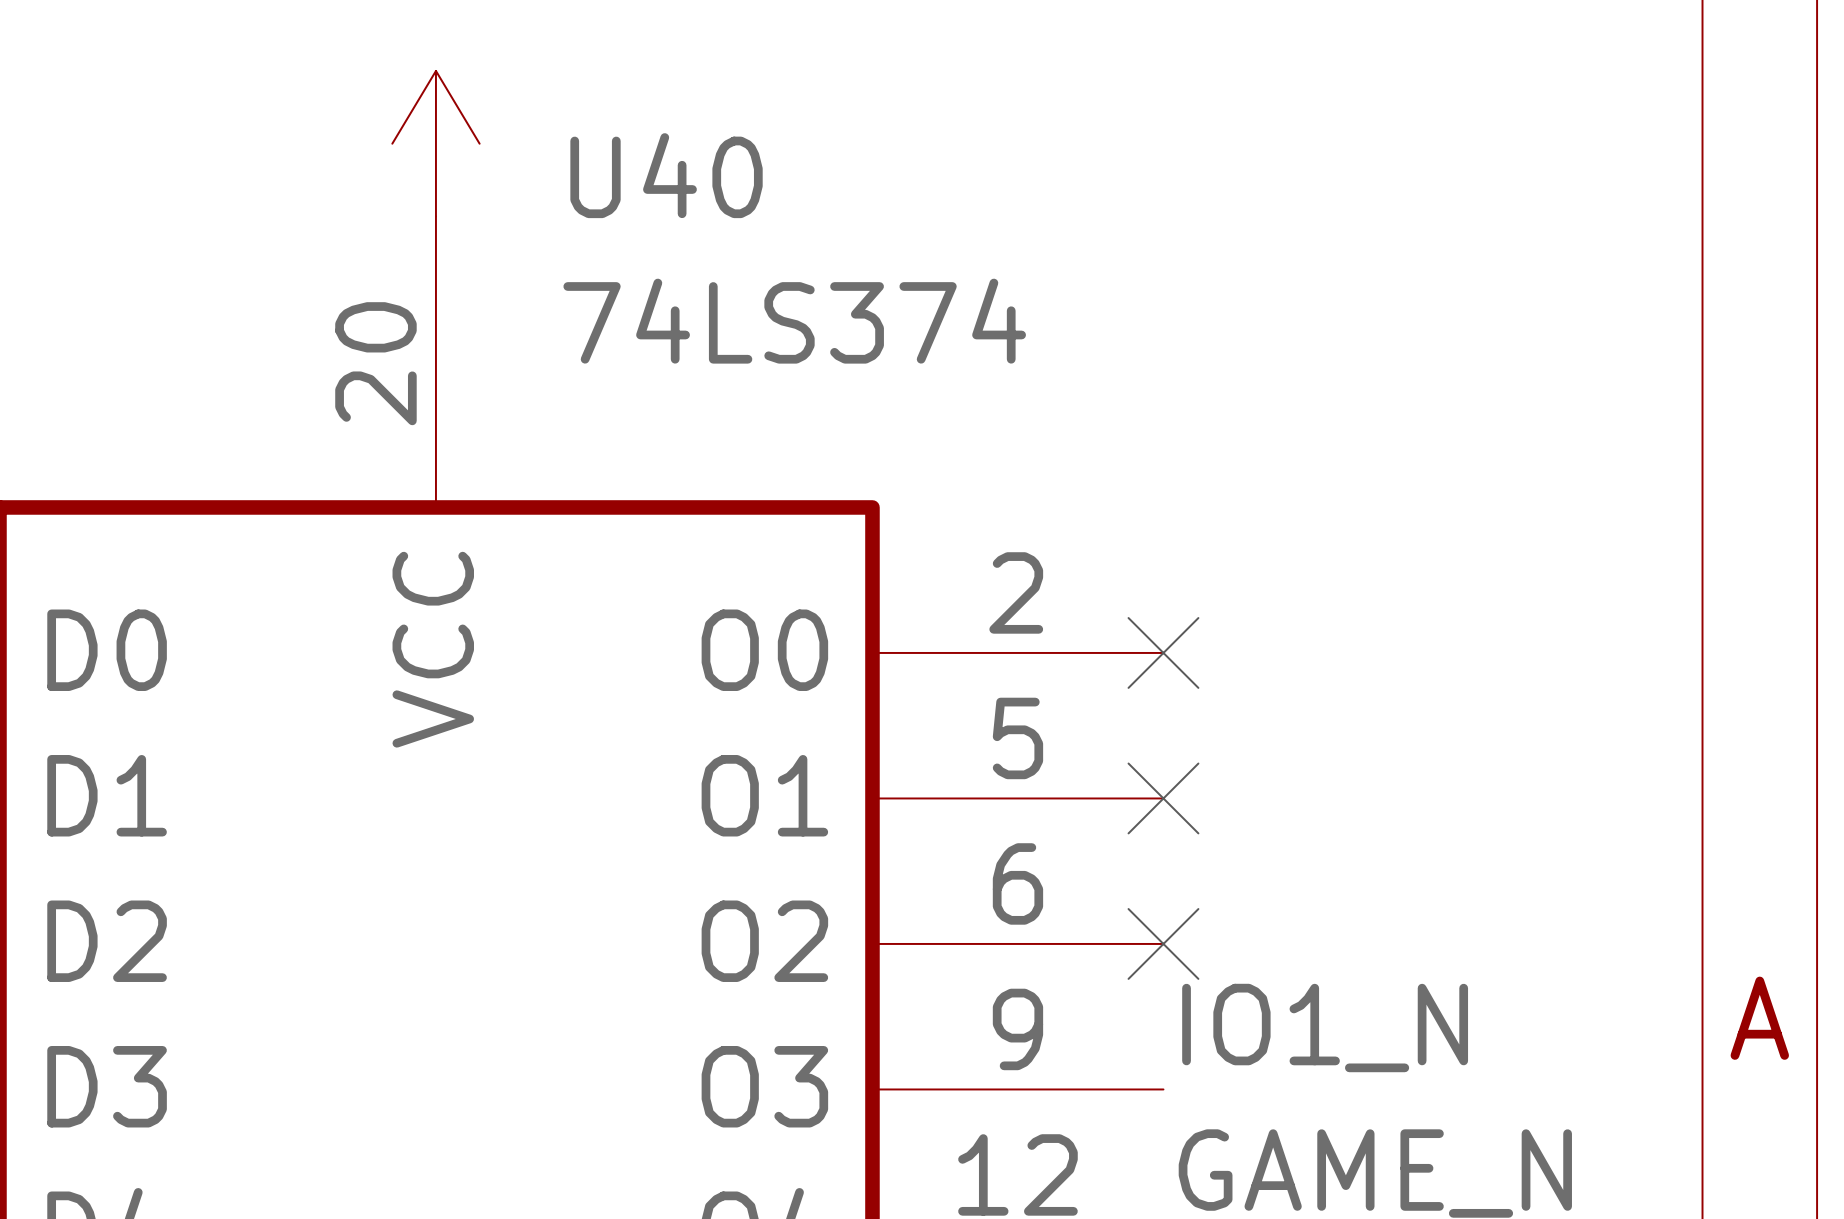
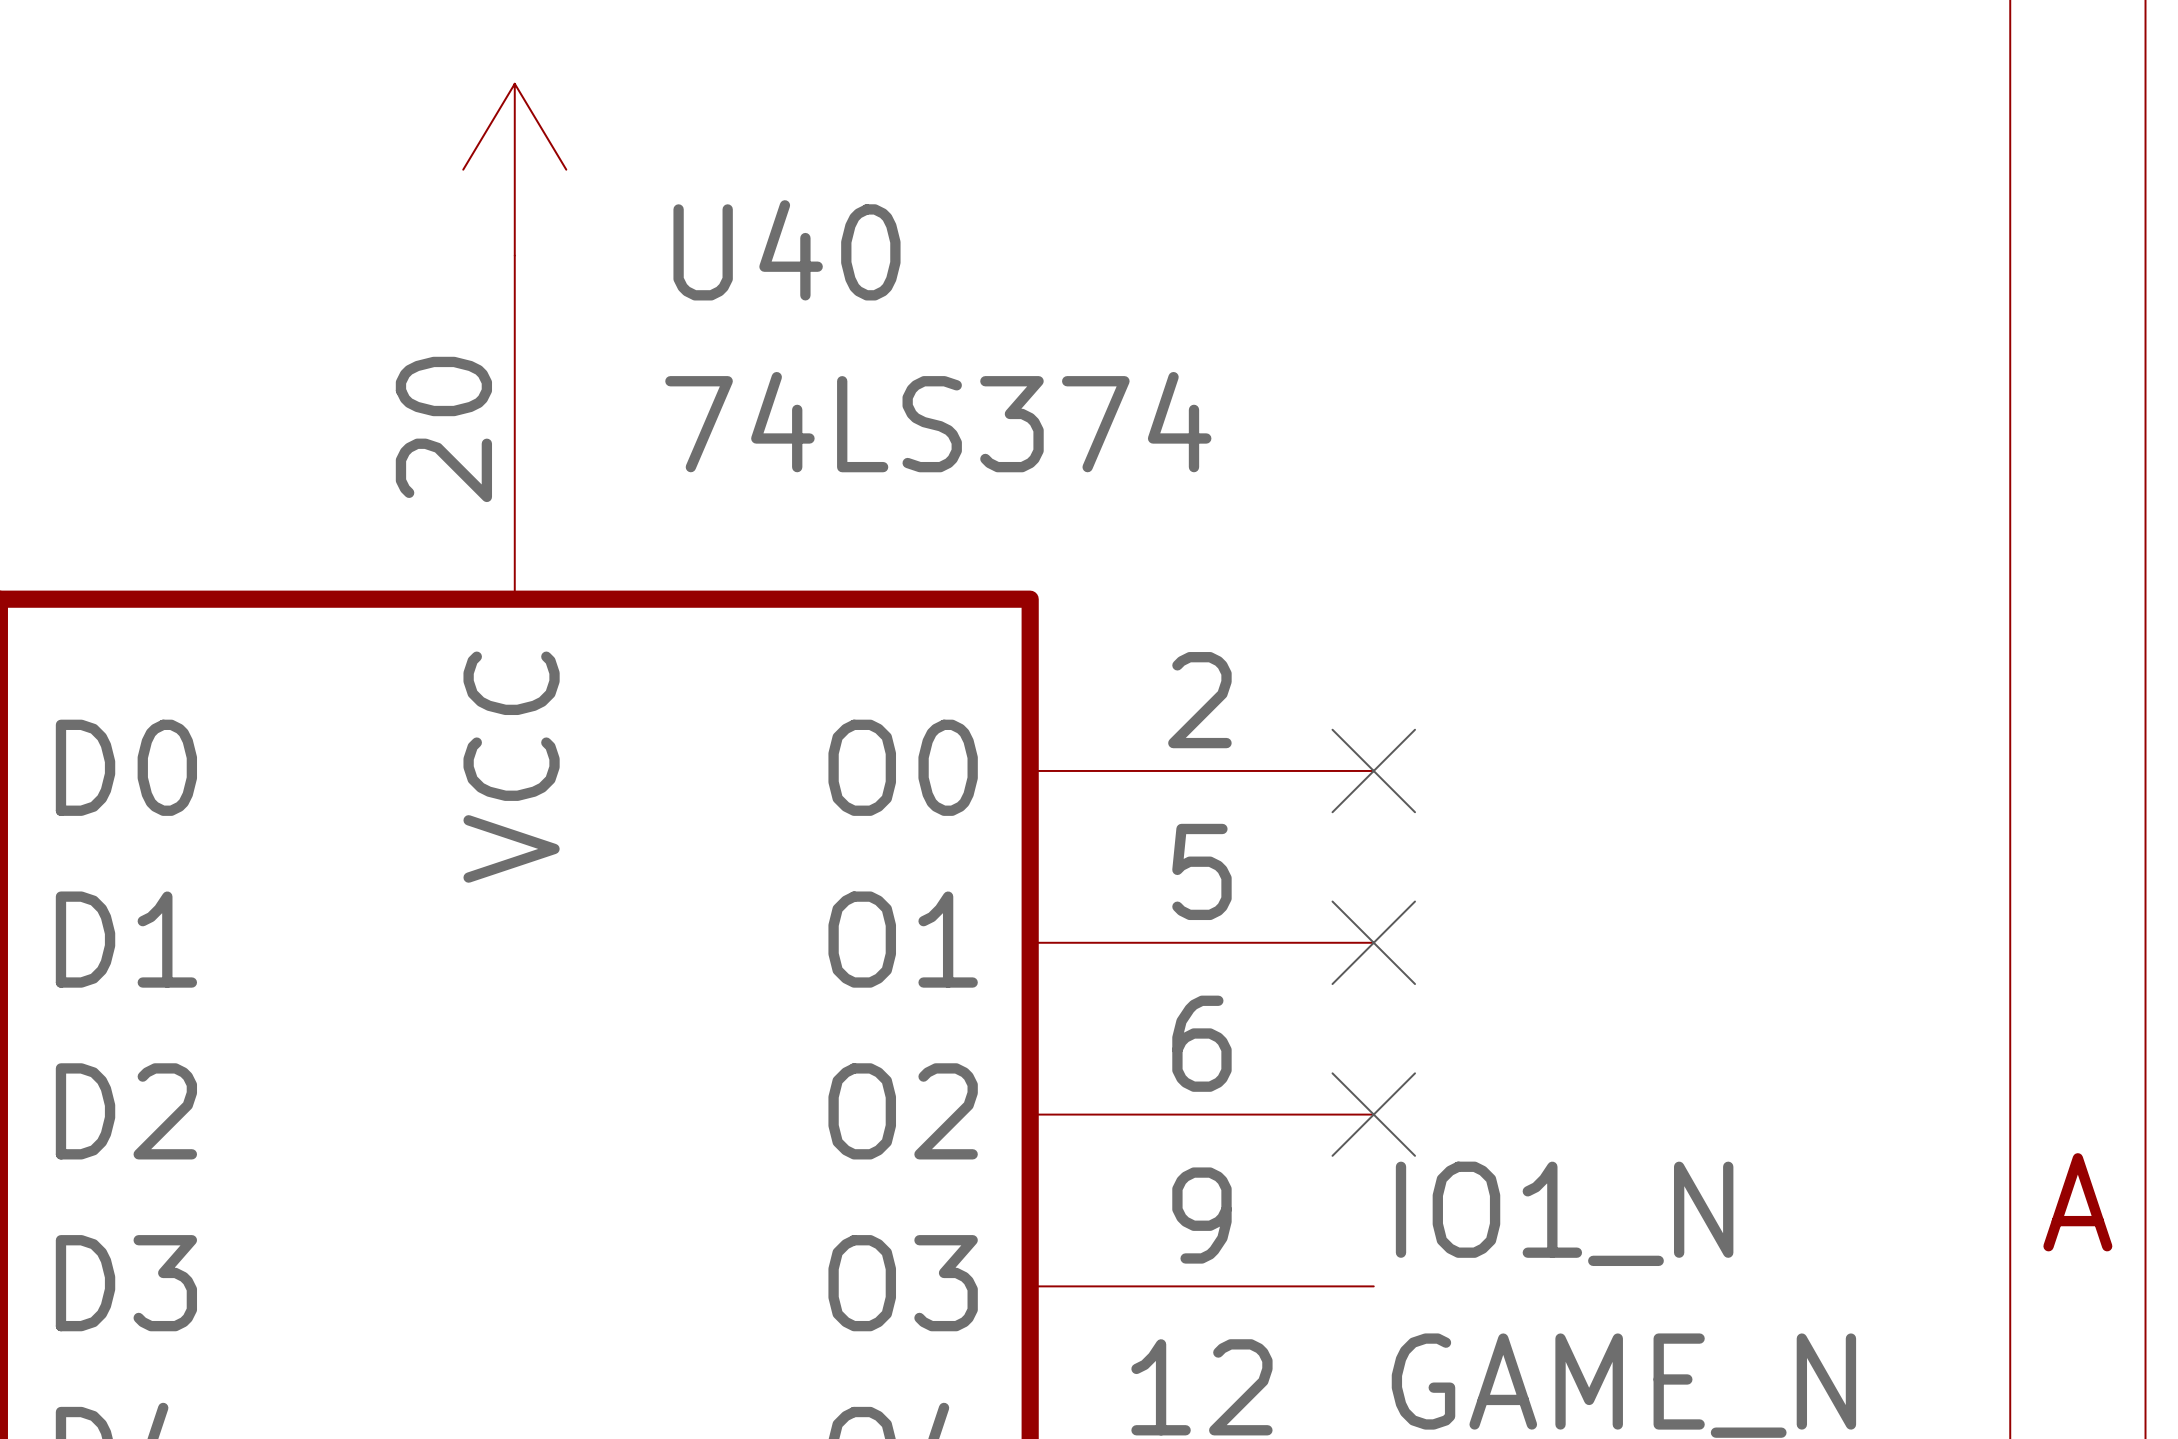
U40 name position: U40 (666, 175) -> U40 (786, 250)
U40 value position: 74LS374 (794, 321) -> 74LS374 (938, 422)

